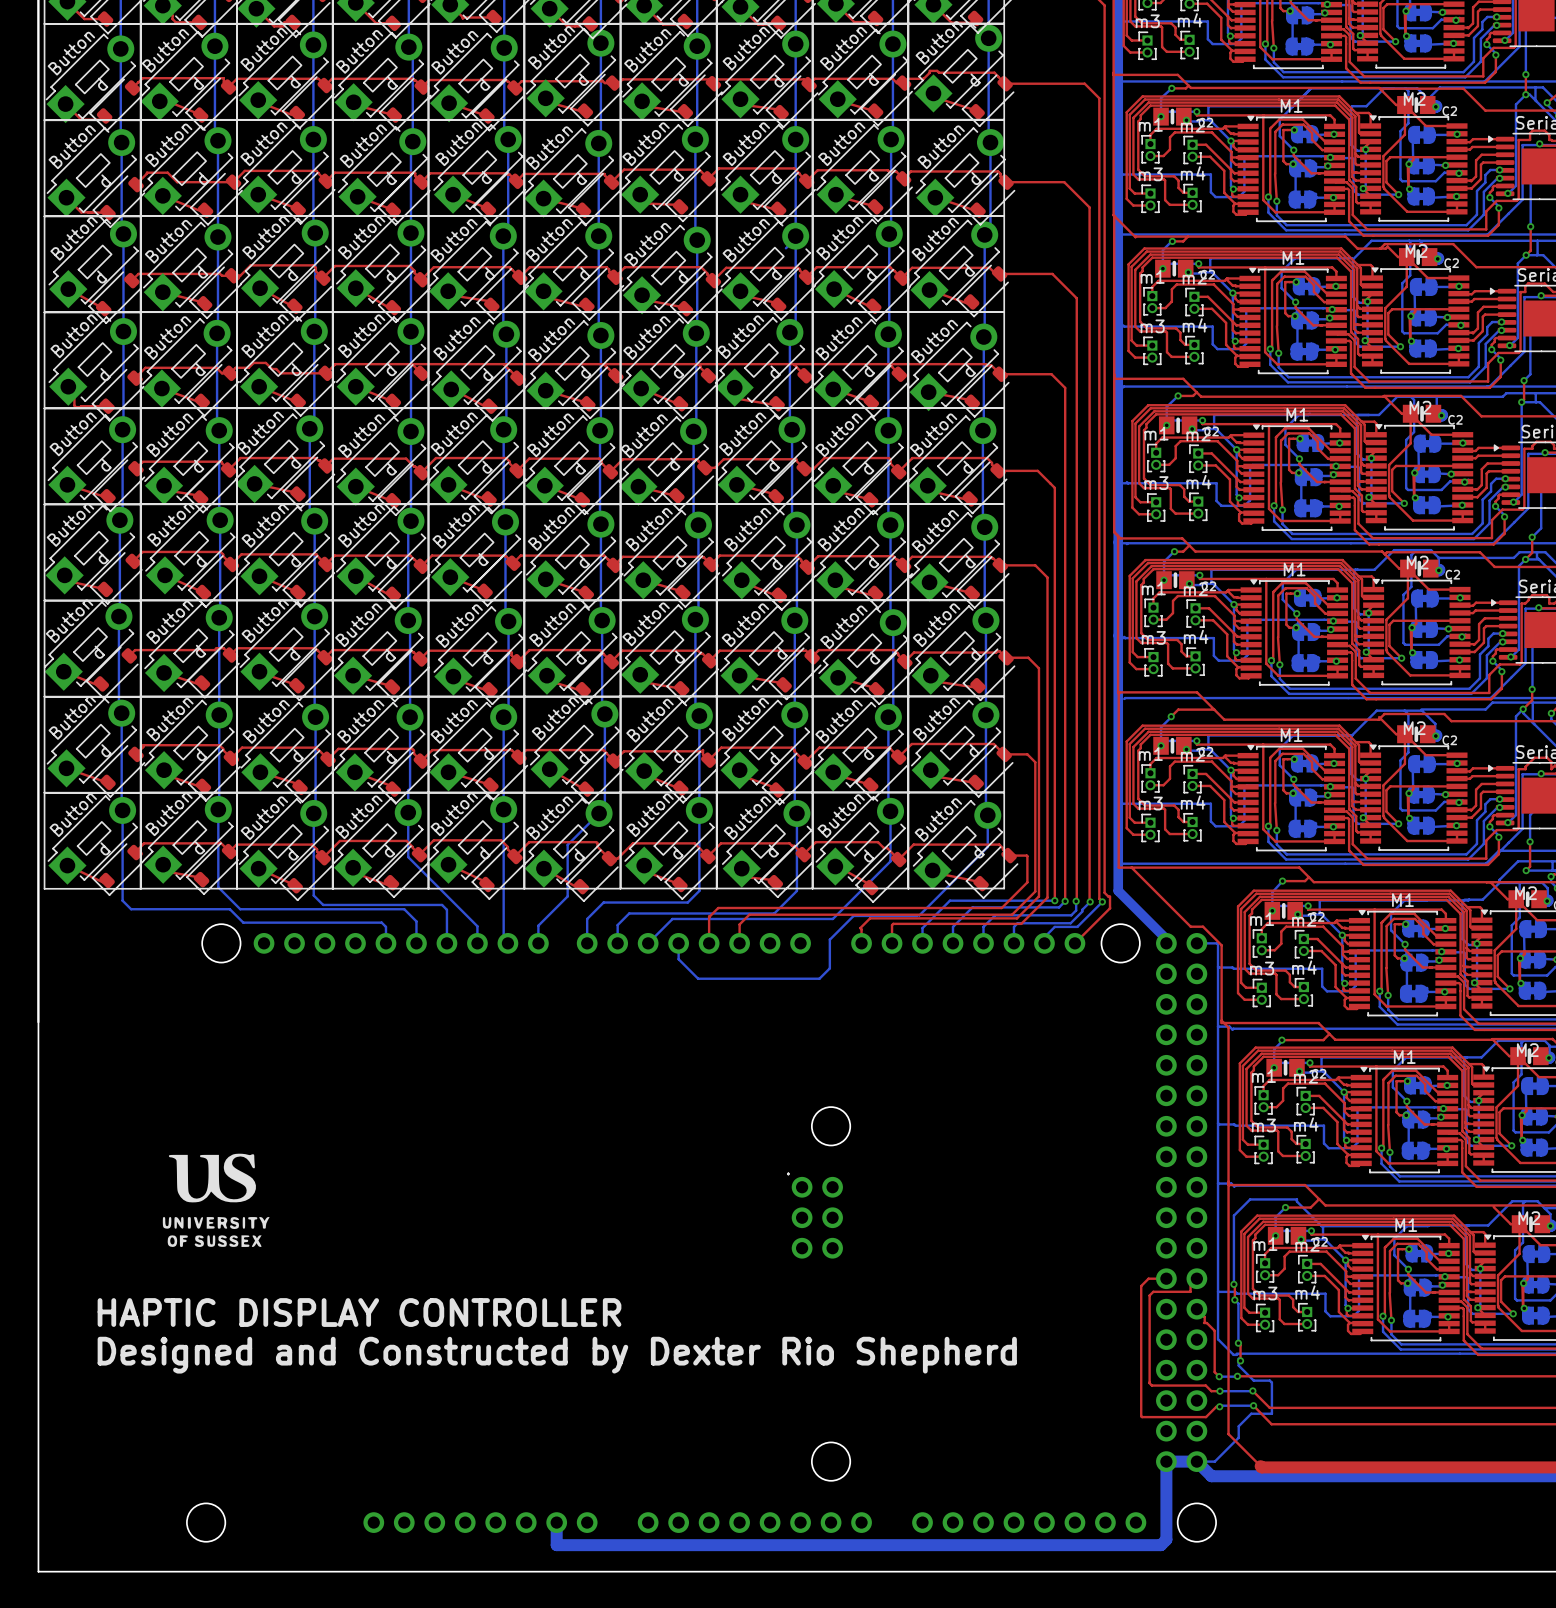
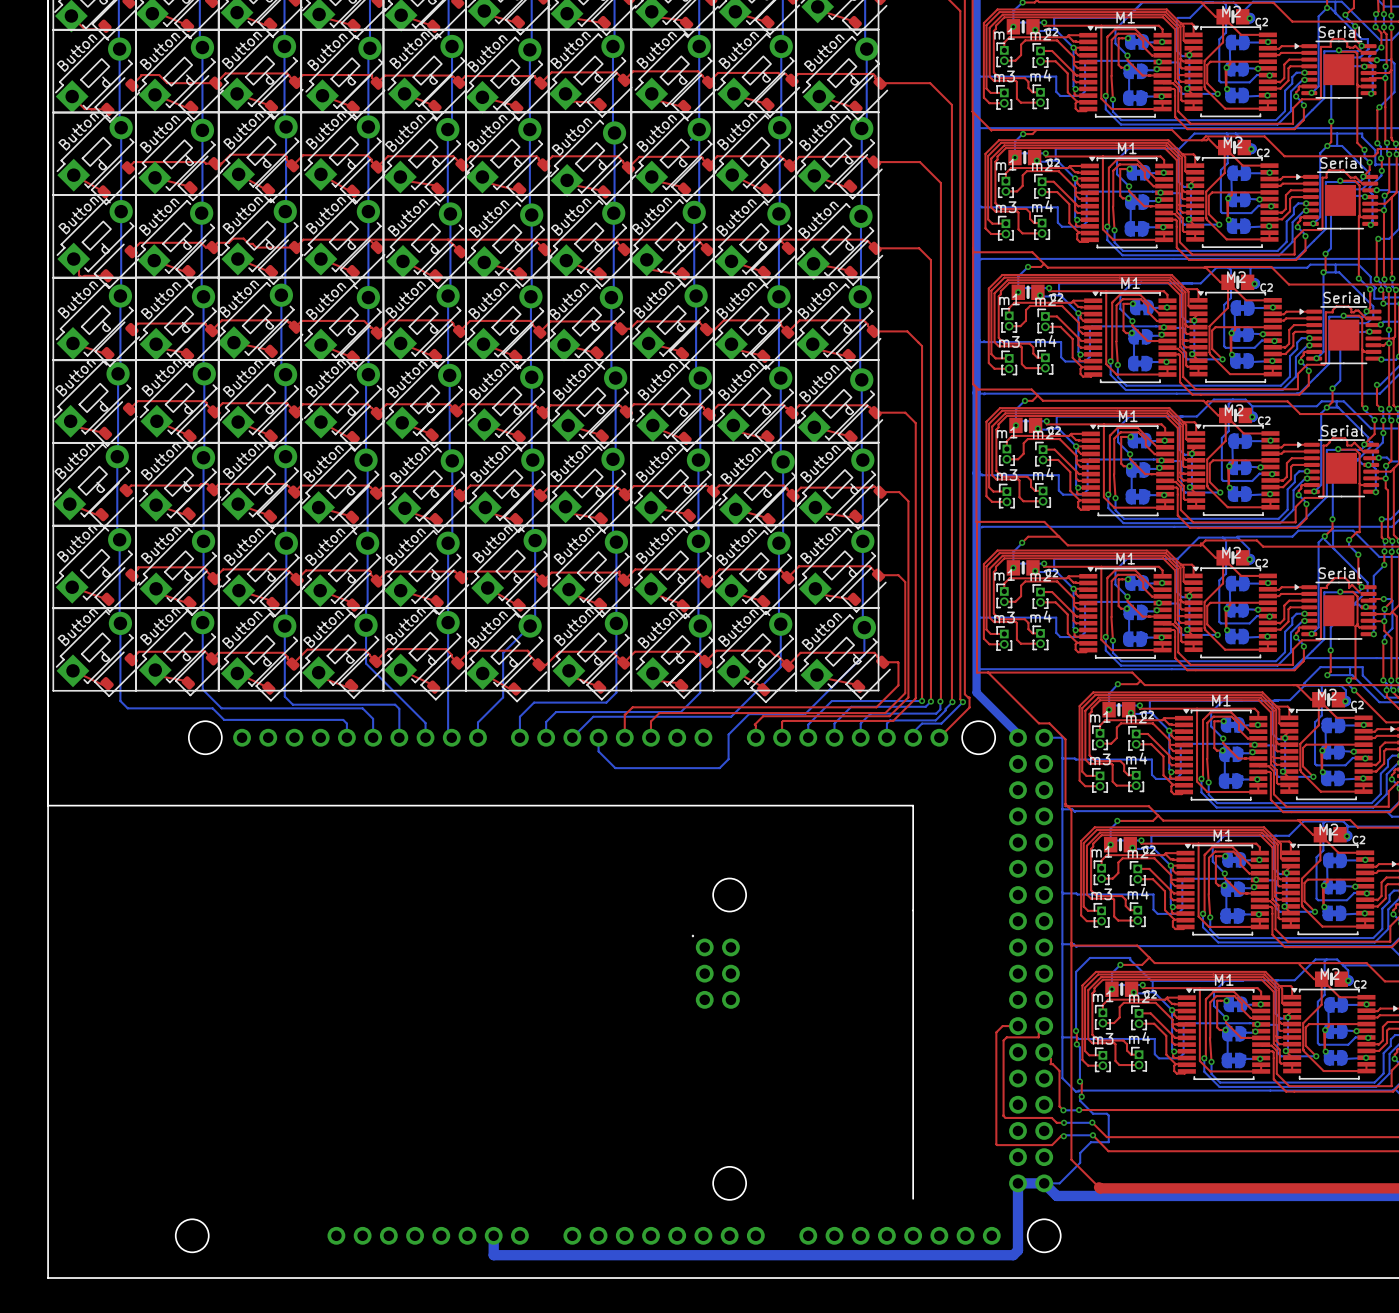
board edge: none -> (48, 805) (913, 805) (913, 1198)
drawing: [162, 1153, 270, 1248] -> none
text: HAPTIC DISPLAY CONTROLLER (359, 1312) -> none
text: Designed and Constructed by Dexter Rio Shepherd (557, 1355) -> none

